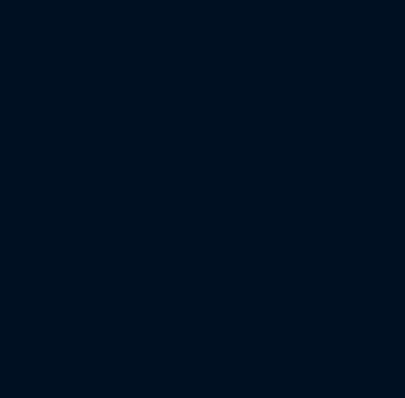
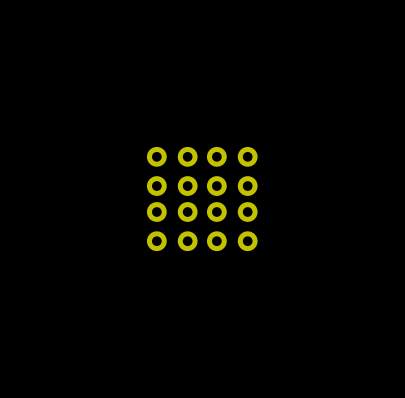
part: none -> (202, 199)

